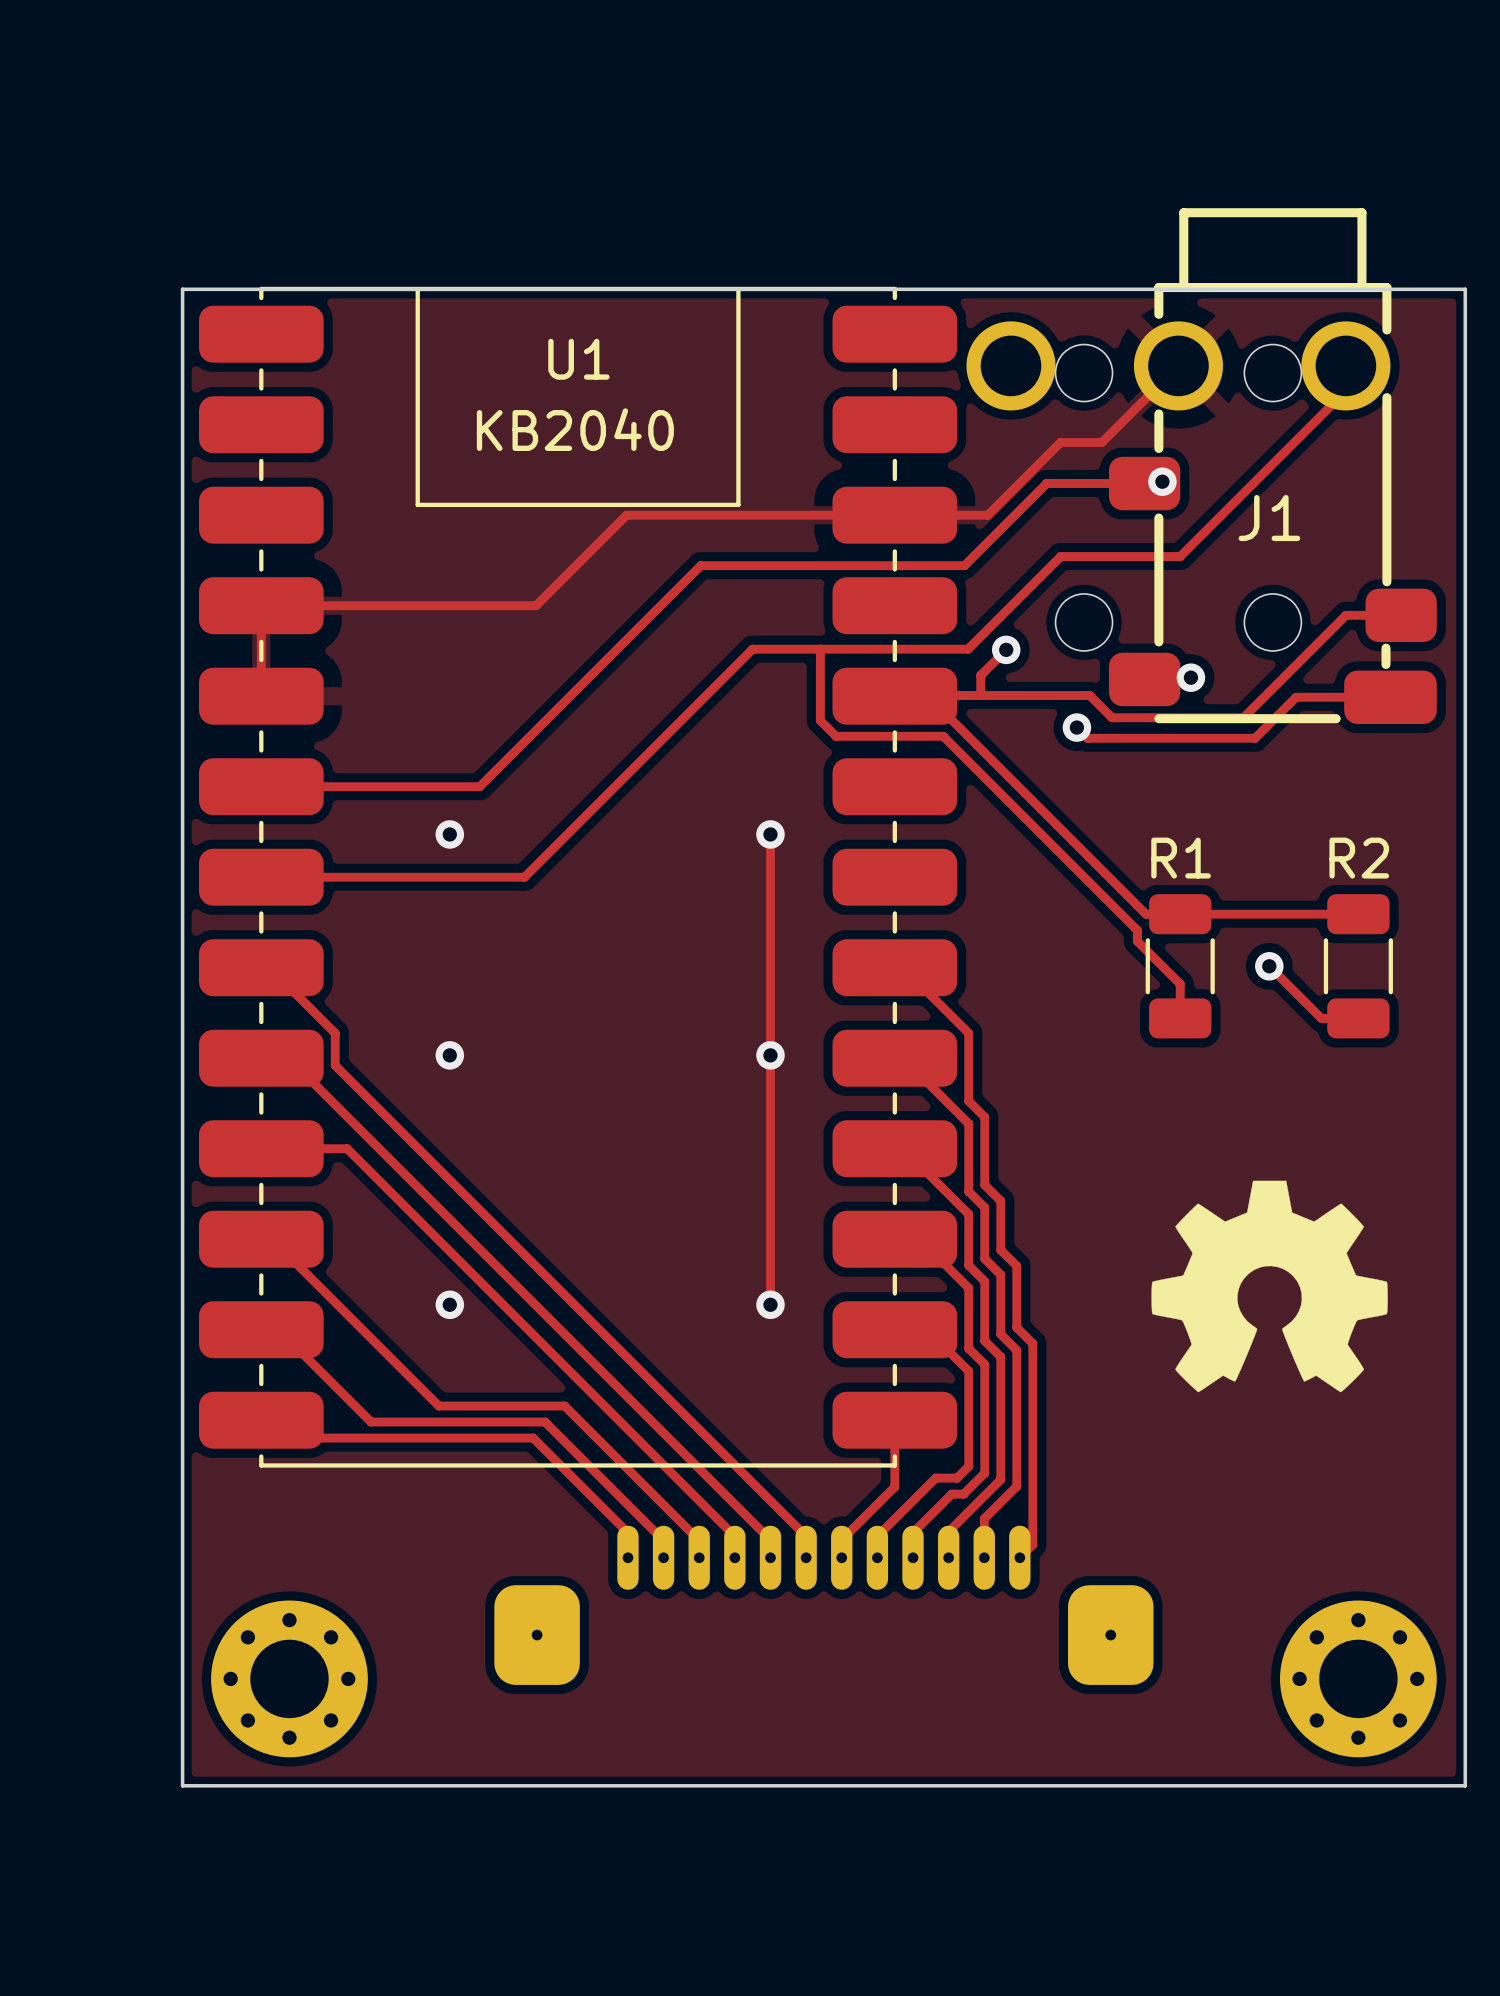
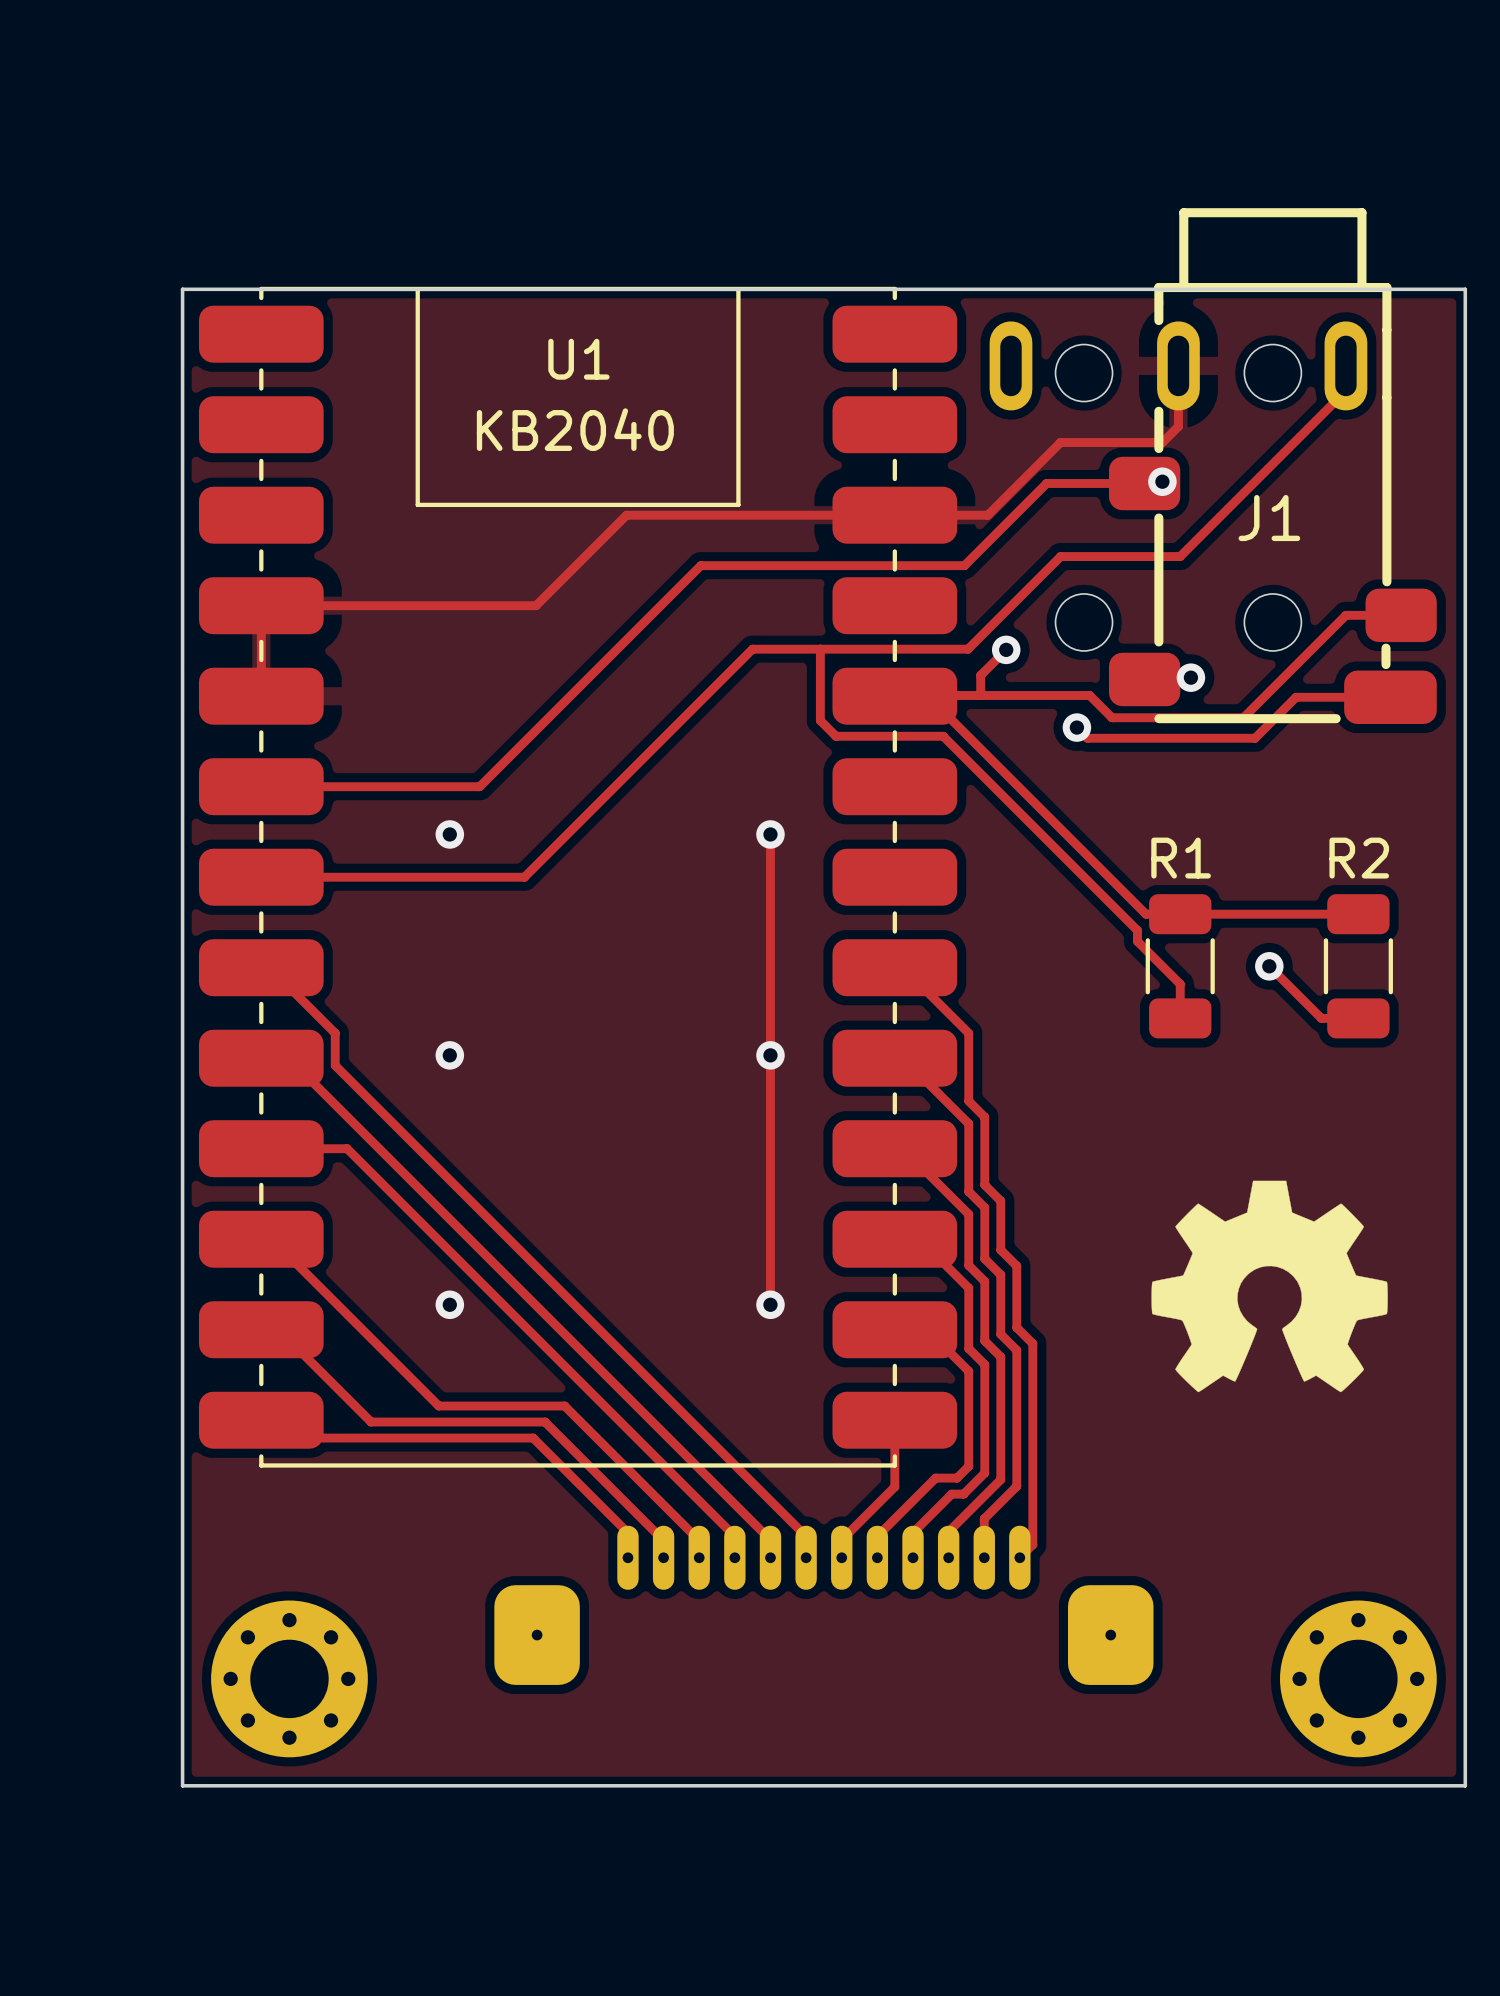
J1 footprint: [966, 208, 1437, 725] -> [989, 208, 1437, 725]
track: (1178, 365) (1101, 442) -> (1178, 365) (1178, 426) (1162, 442) (1101, 442)

